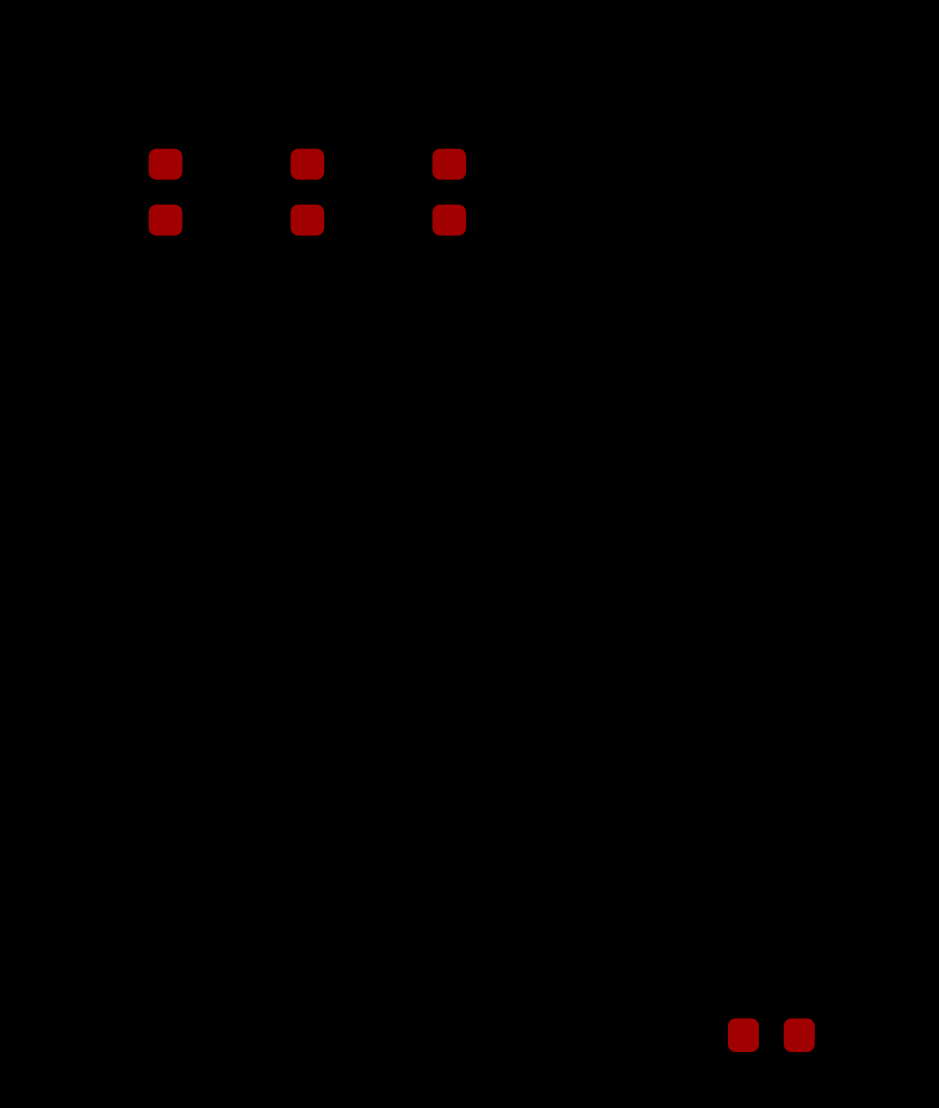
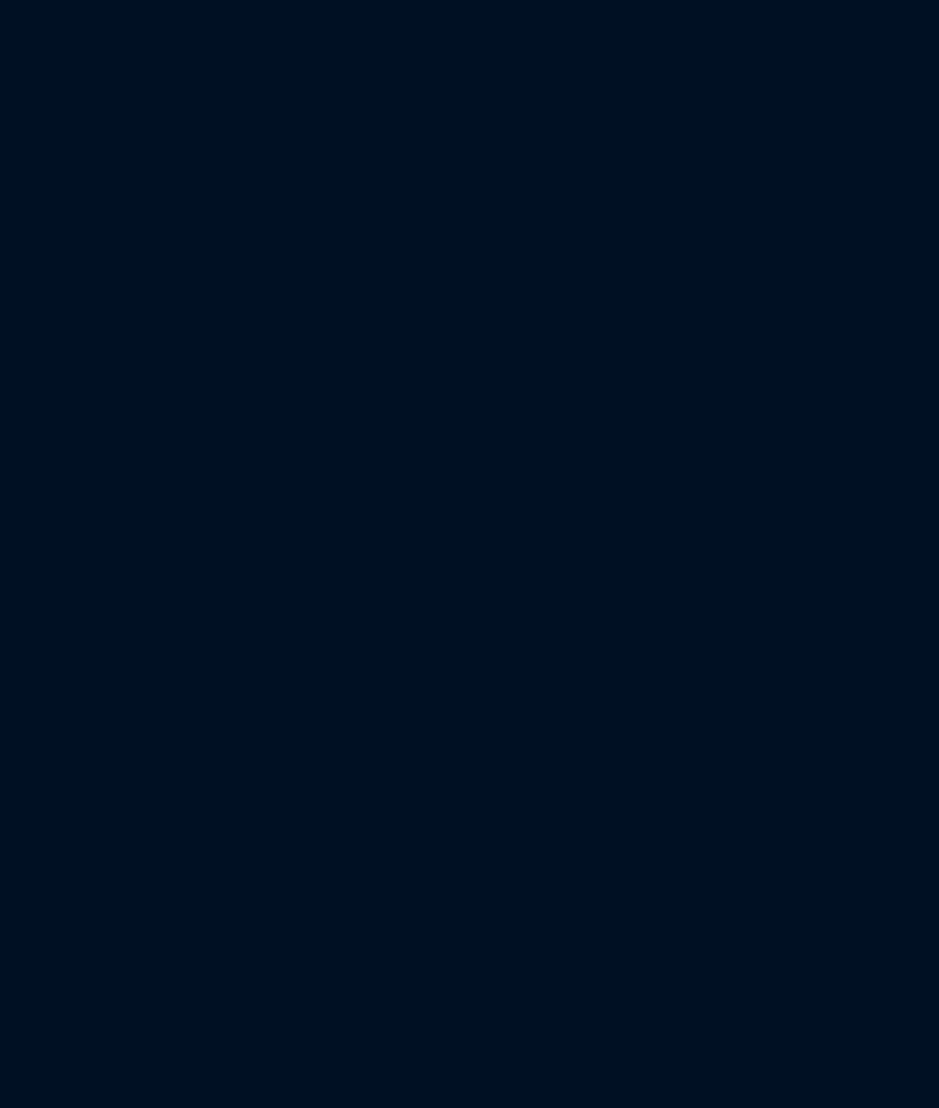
part: (165, 192) -> none
part: (307, 192) -> none
part: (449, 192) -> none
part: (771, 1035) -> none

